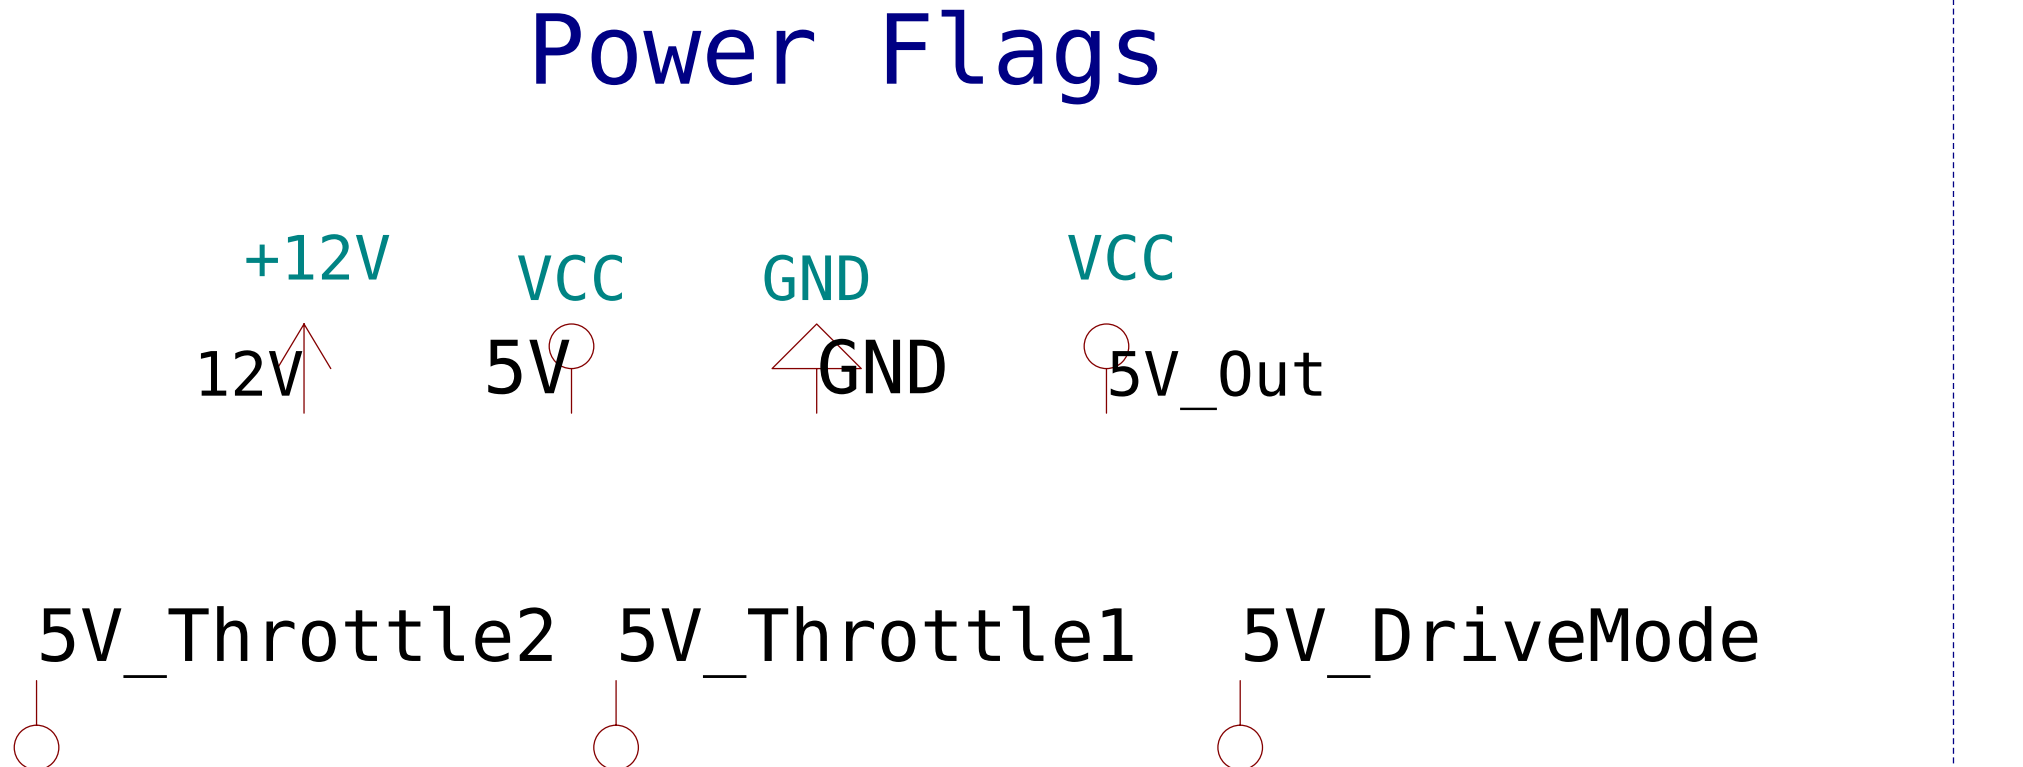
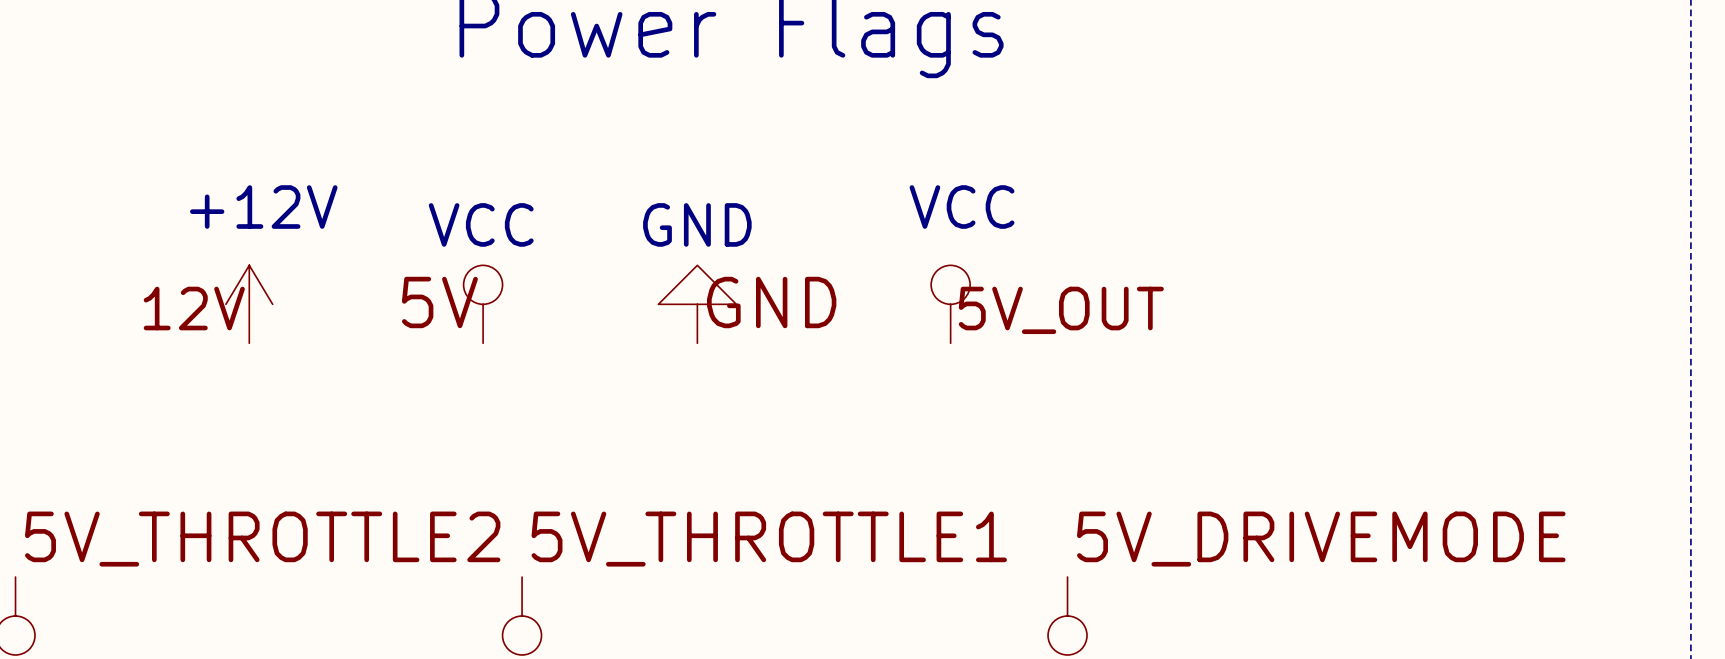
label: 5V_Out (1216, 380) -> 5V_OUT (1061, 310)
label: 5V_Throttle2 (296, 641) -> 5V_THROTTLE2 (262, 539)
label: 5V_Throttle1 (876, 641) -> 5V_THROTTLE1 (769, 539)
label: 5V_DriveMode (1501, 642) -> 5V_DRIVEMODE (1321, 539)

